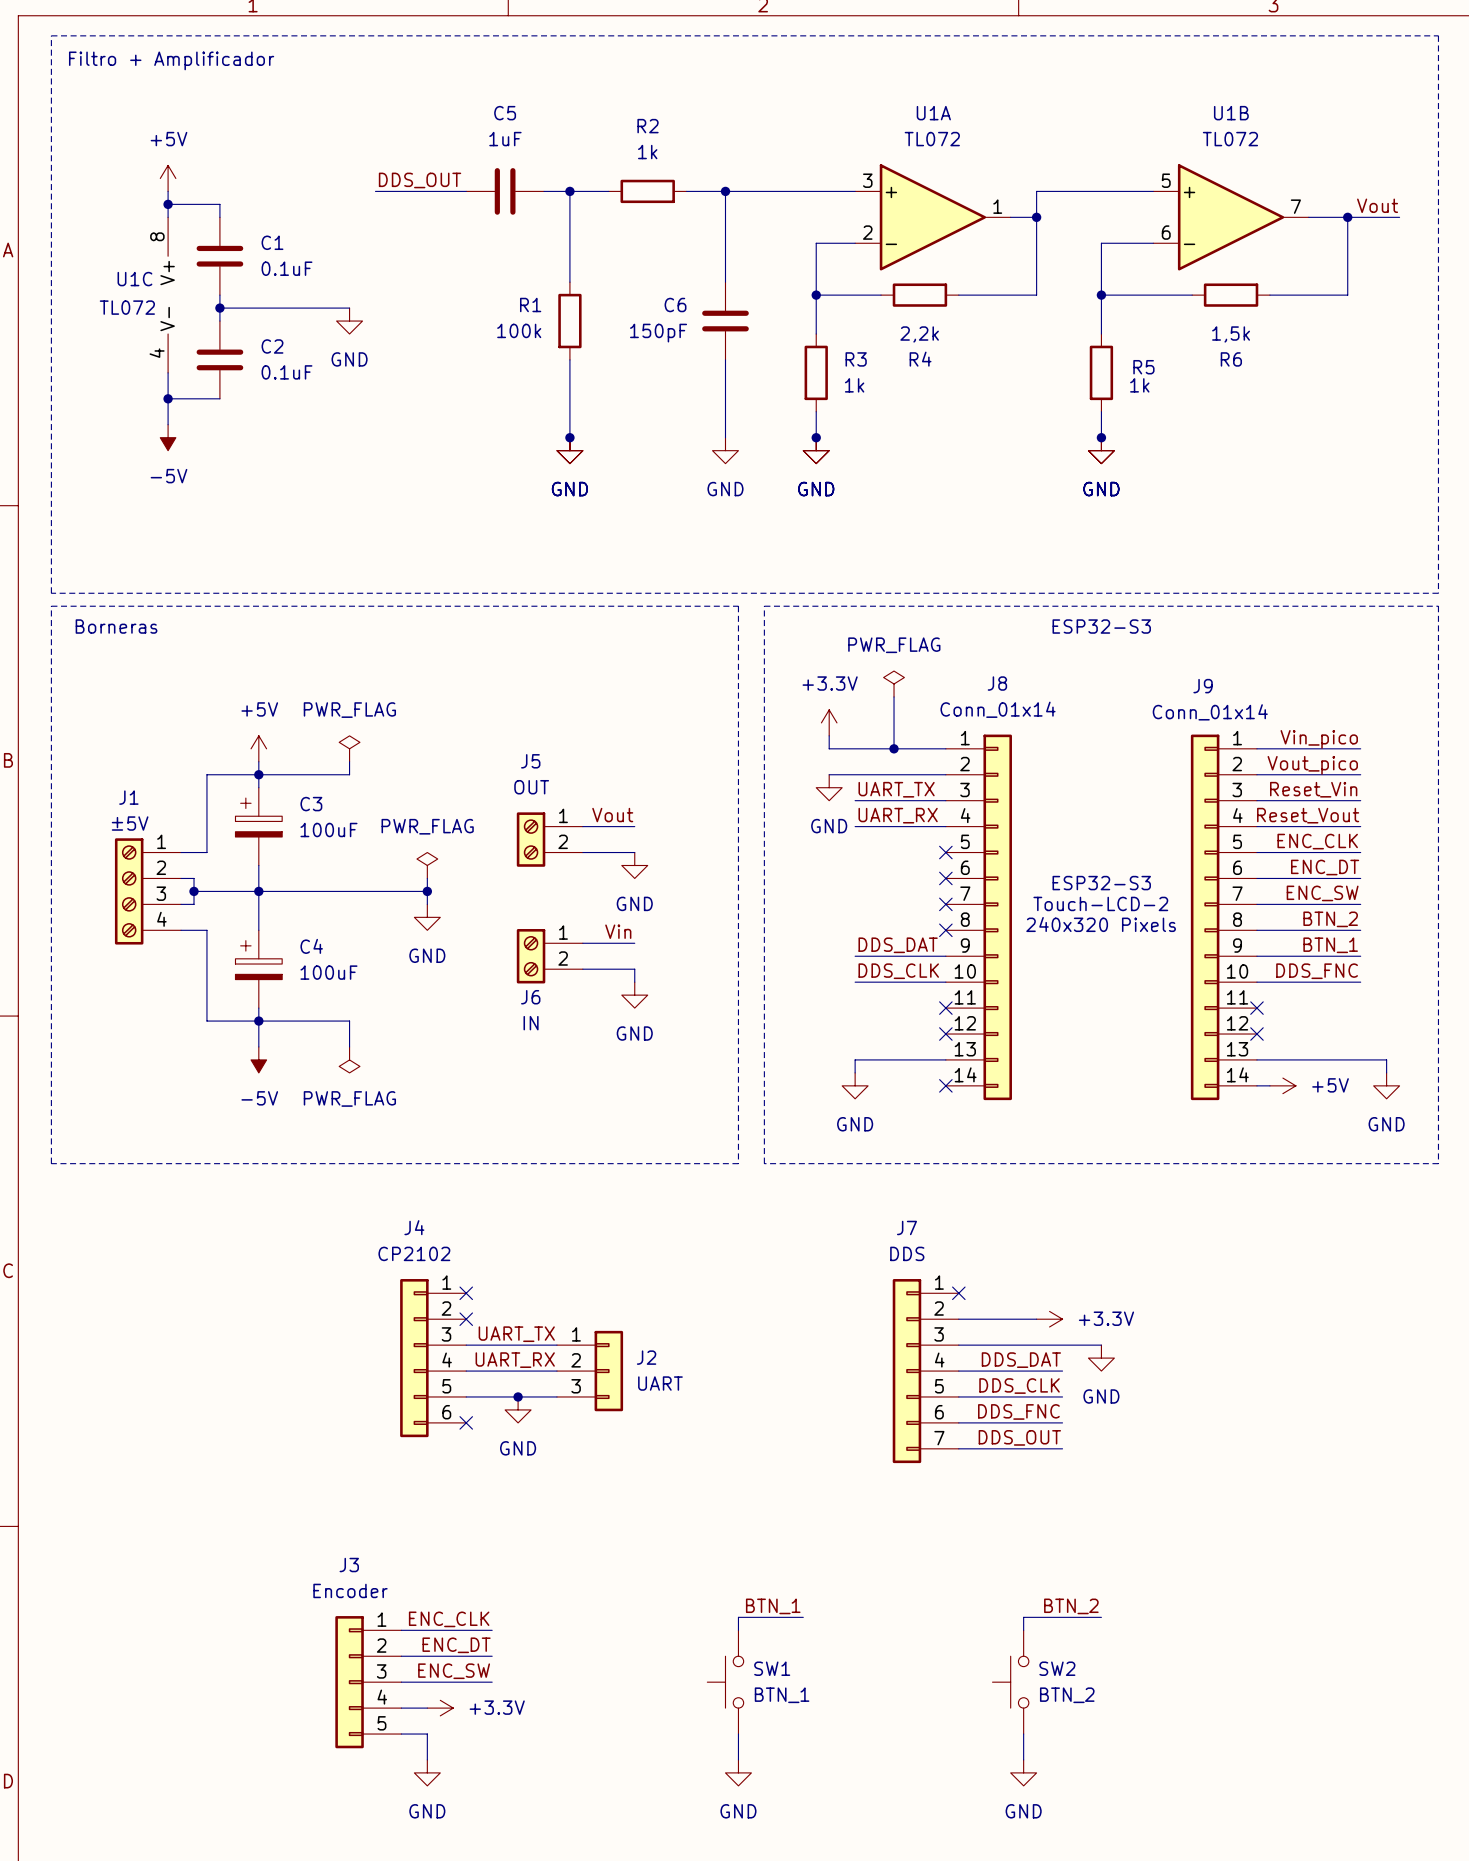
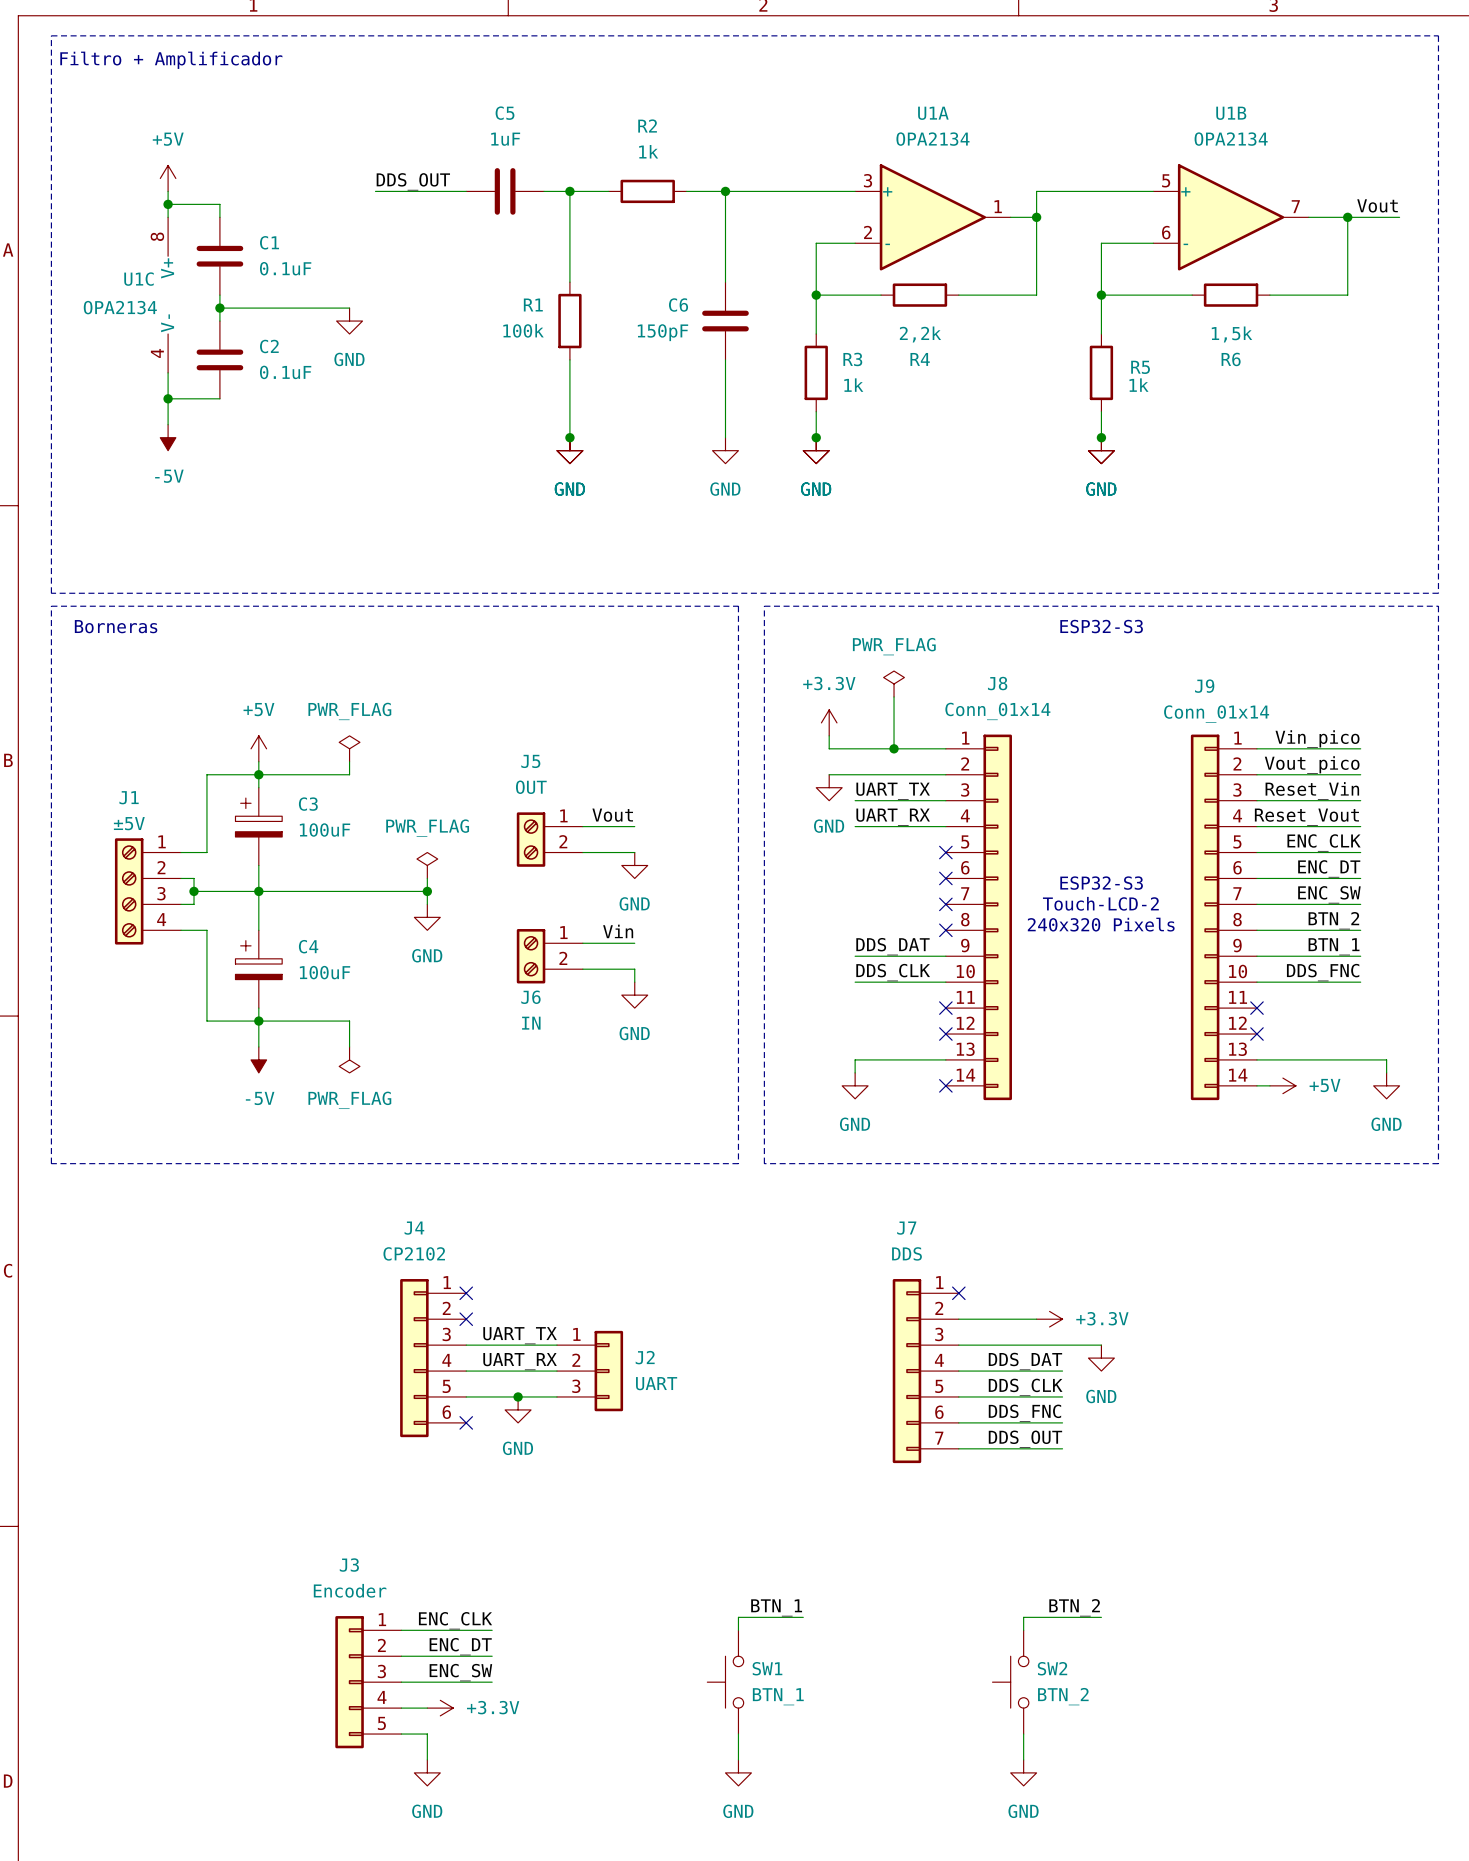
U1A value: TL072 (932, 139) -> OPA2134 (932, 139)
U1B value: TL072 (1230, 139) -> OPA2134 (1231, 139)
U1C value: TL072 (127, 307) -> OPA2134 (120, 307)

